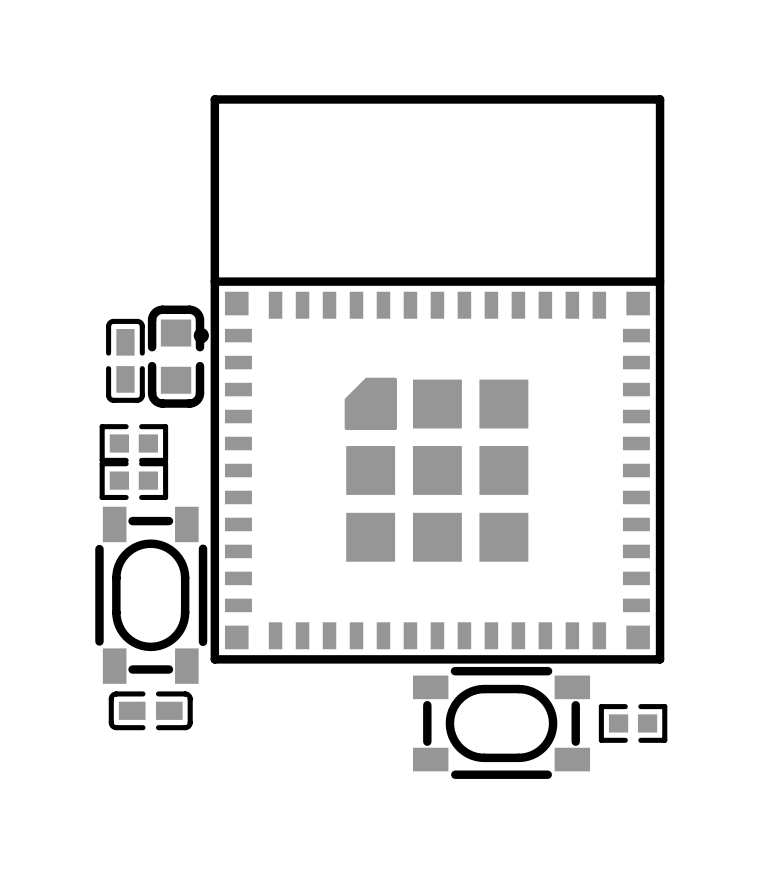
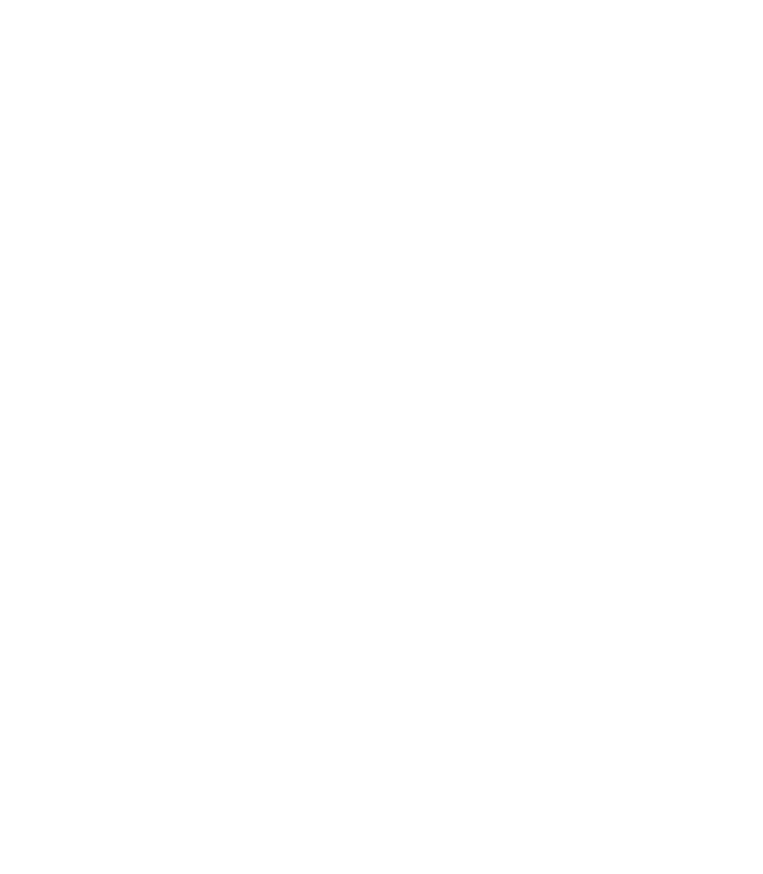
part: (176, 356) -> none
part: (125, 360) -> none
part: (429, 379) -> none
part: (133, 443) -> none
part: (133, 480) -> none
part: (151, 595) -> none
part: (150, 710) -> none
part: (501, 722) -> none
part: (633, 723) -> none

